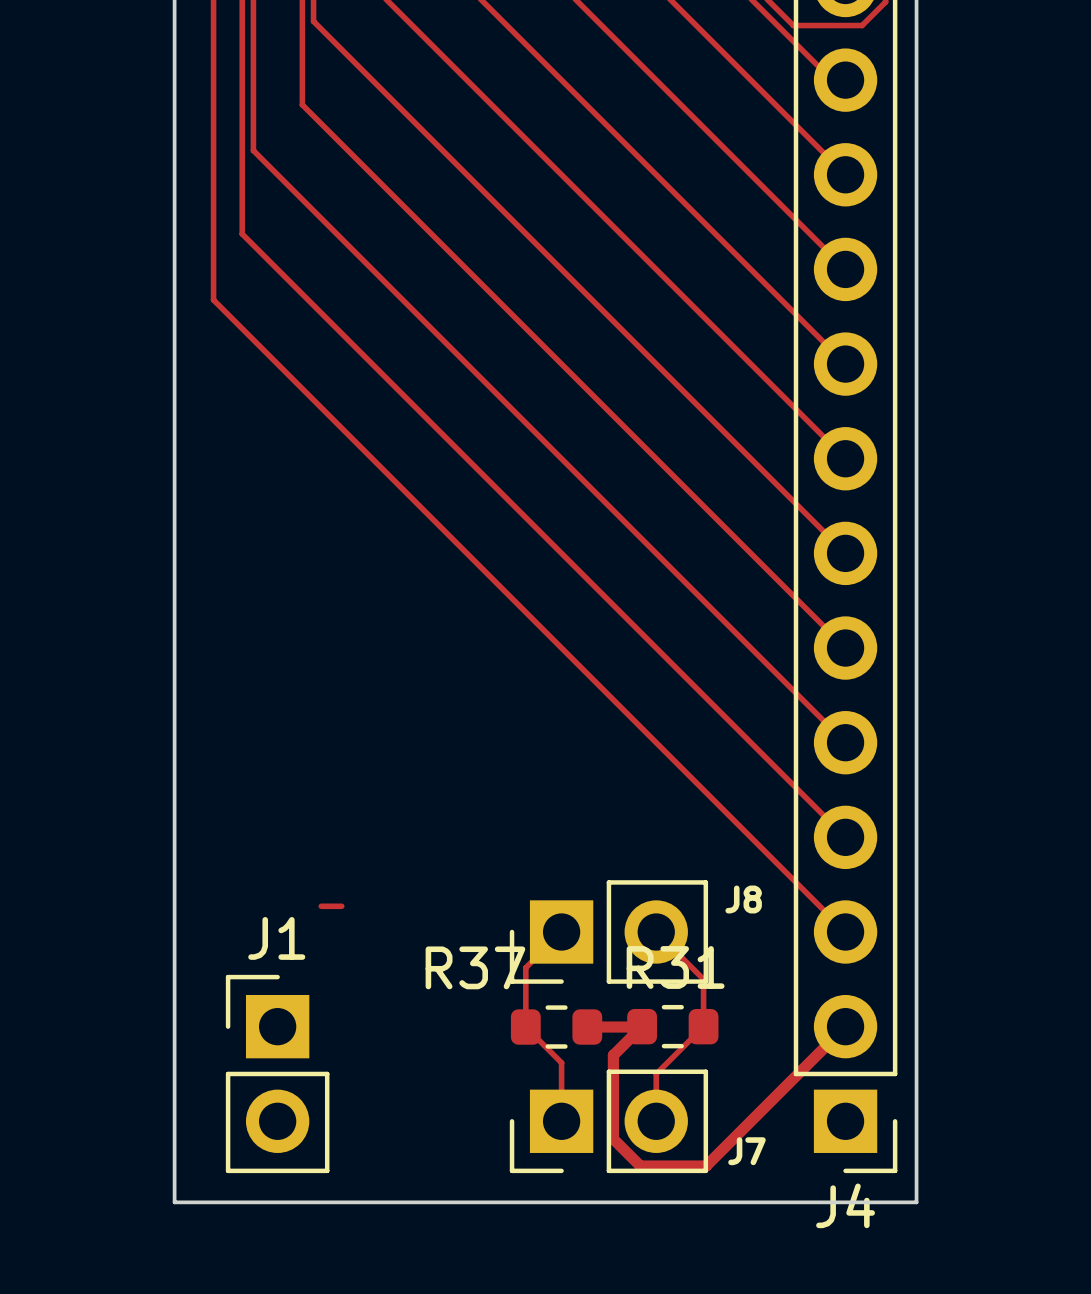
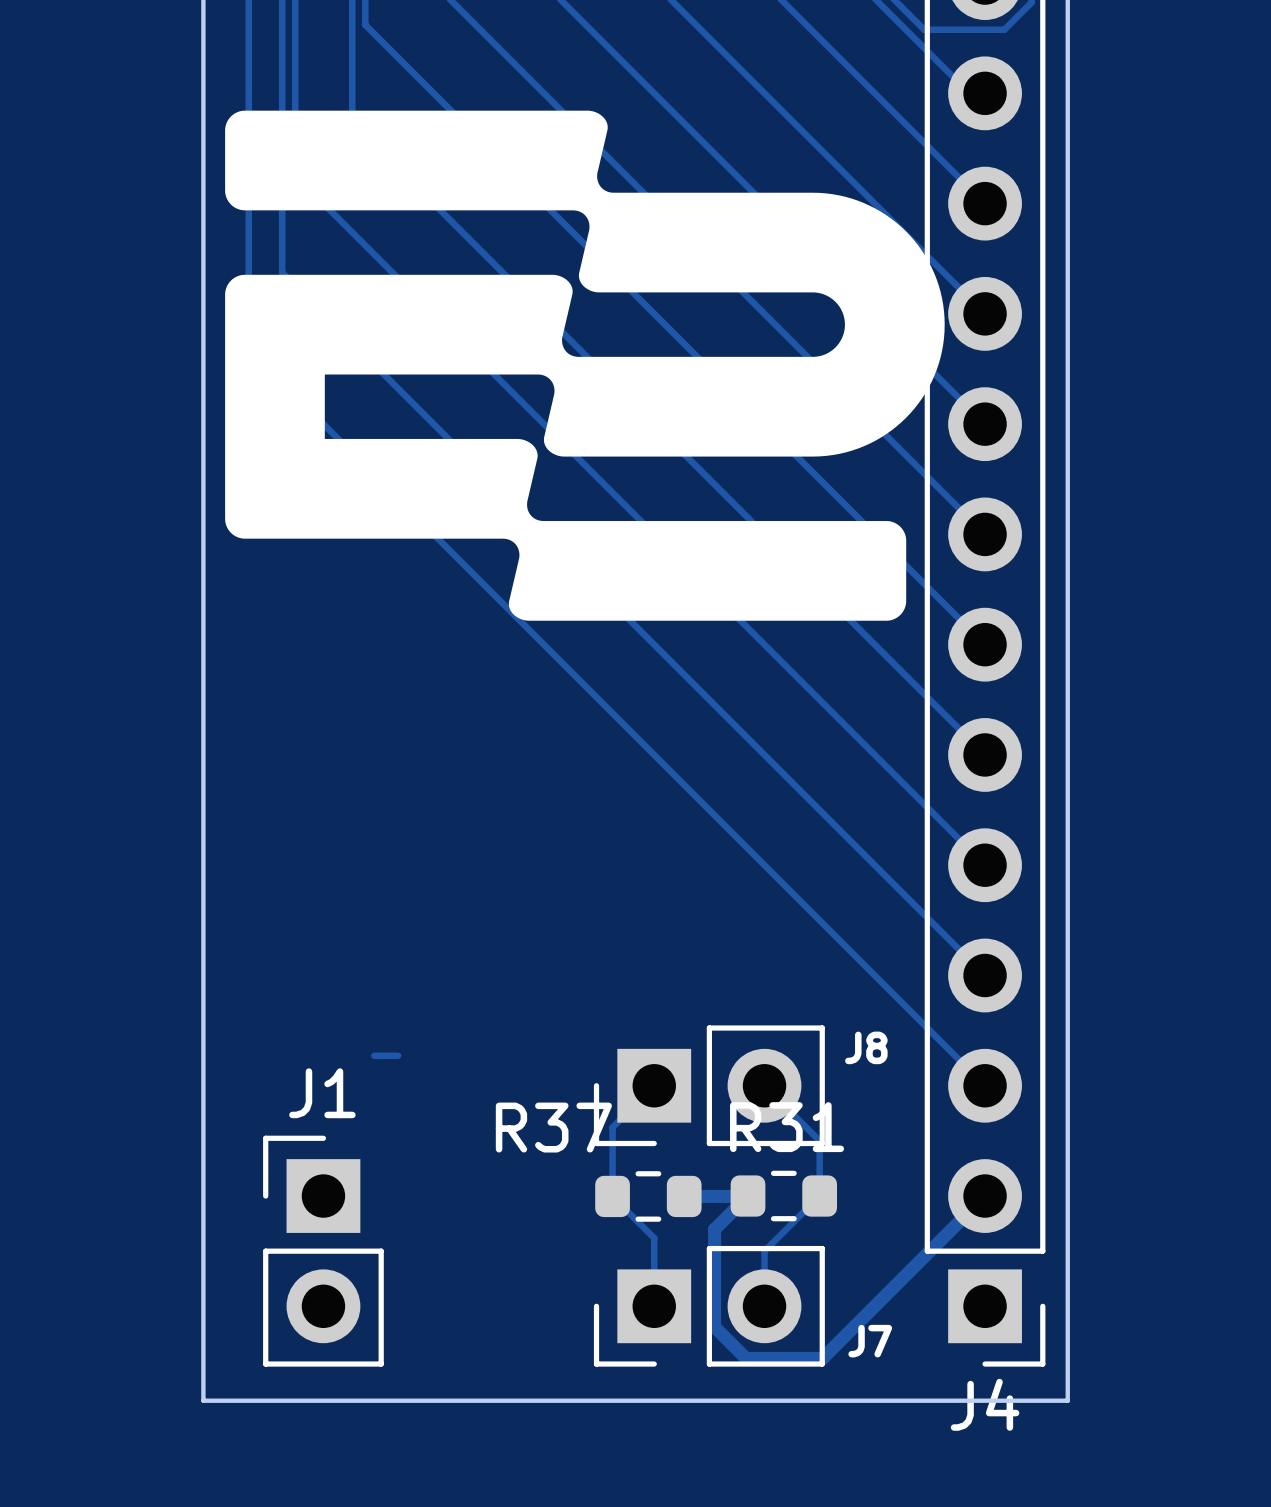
drawing: none -> [225, 110, 945, 621]

